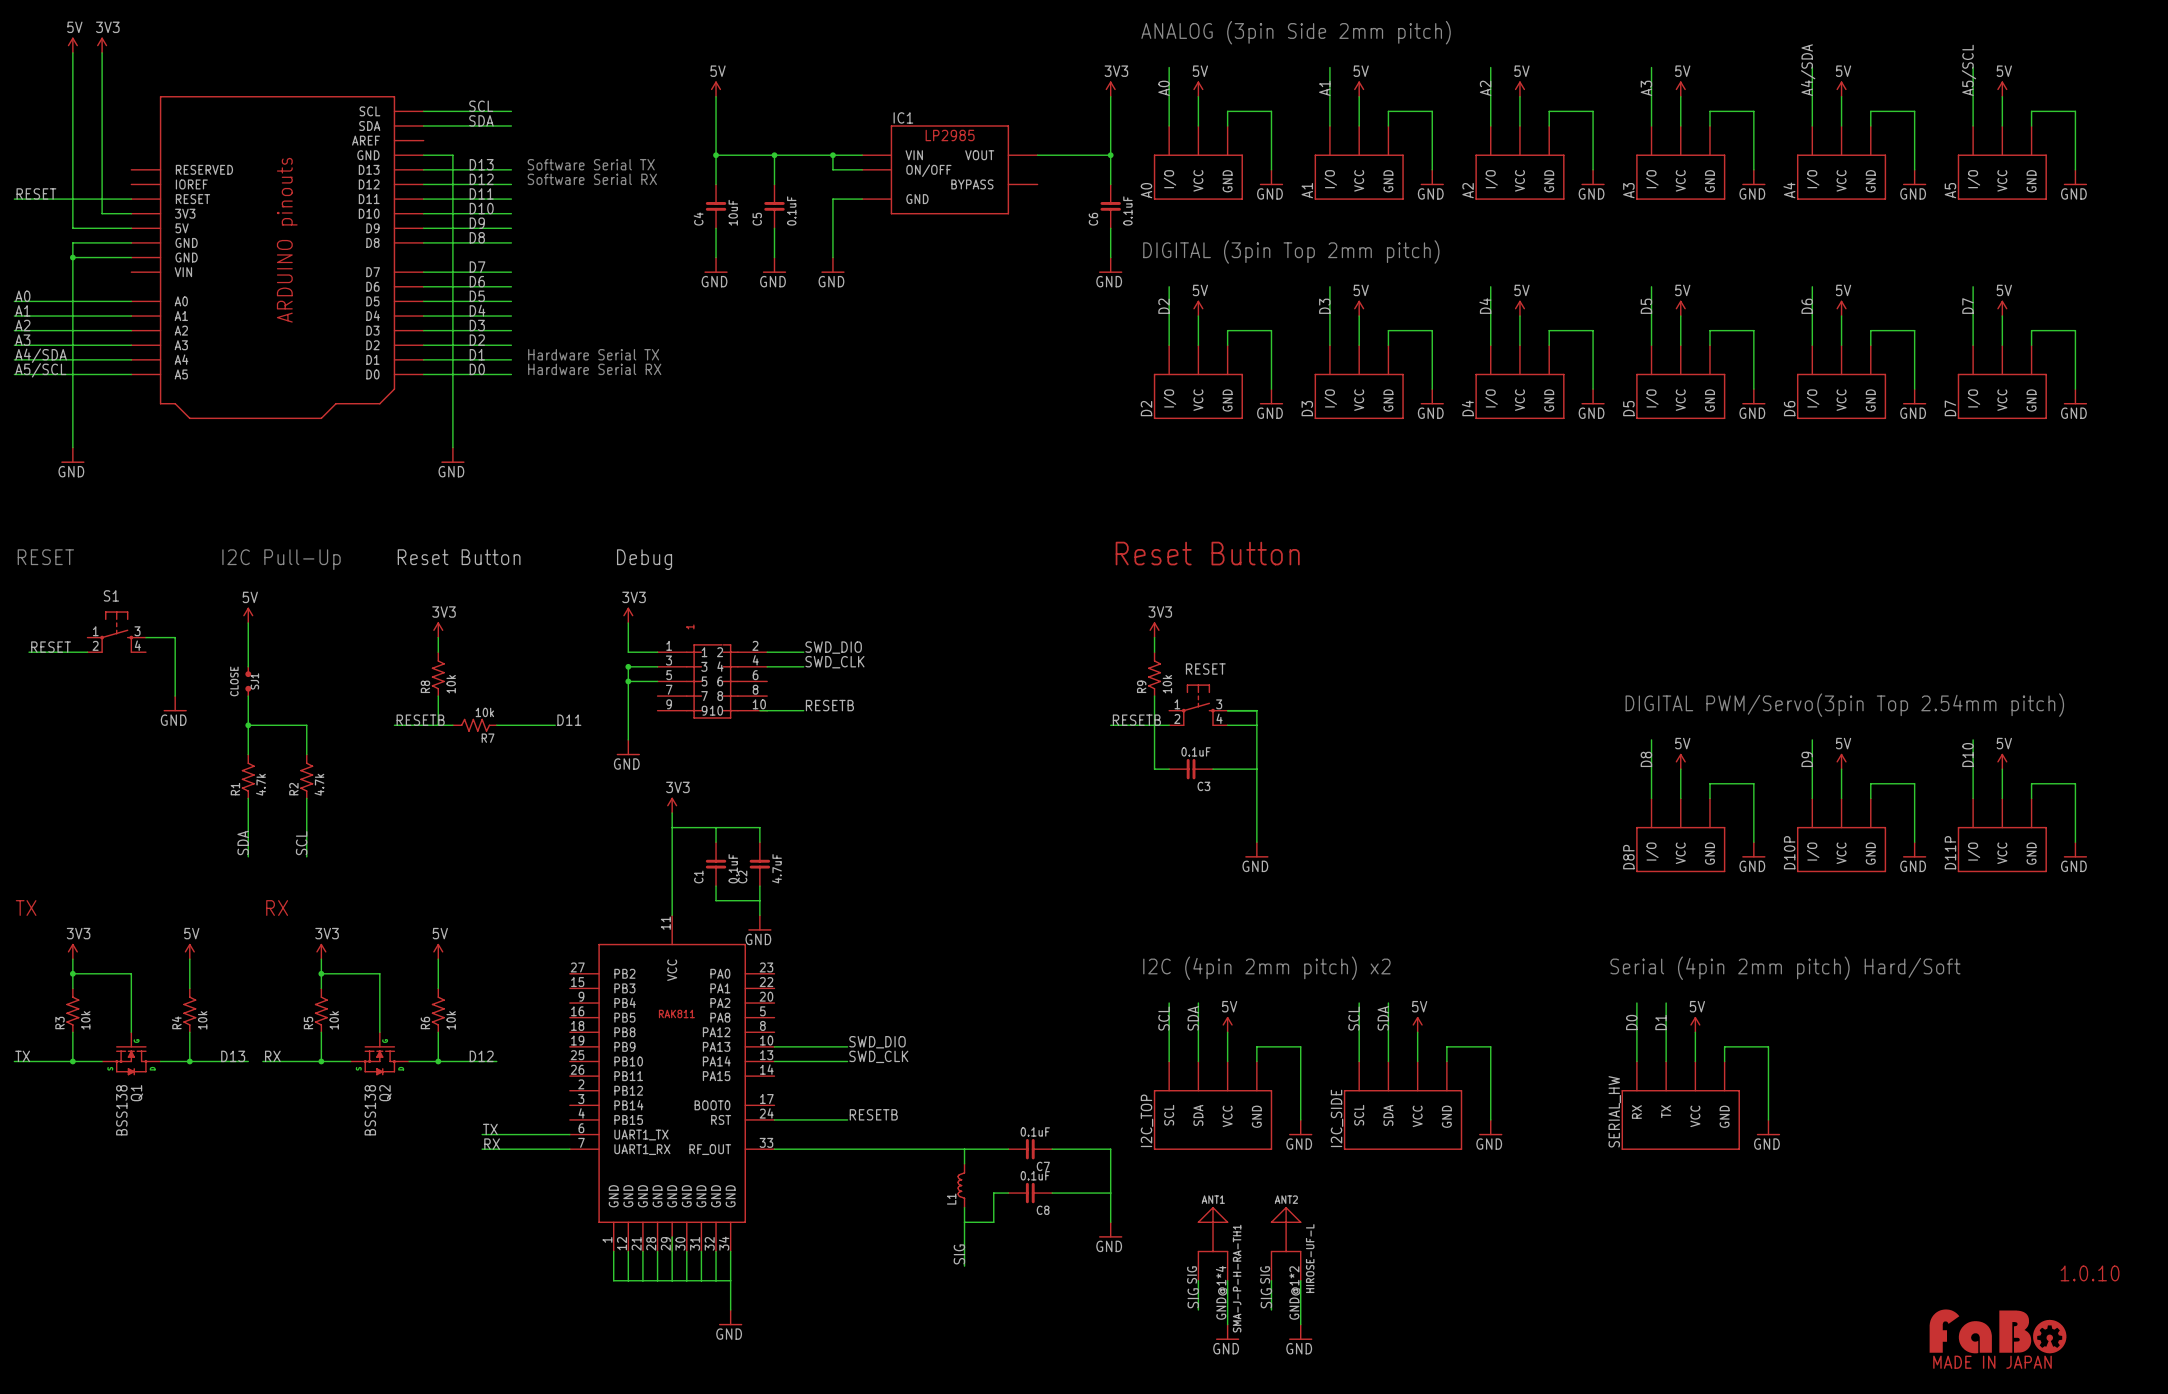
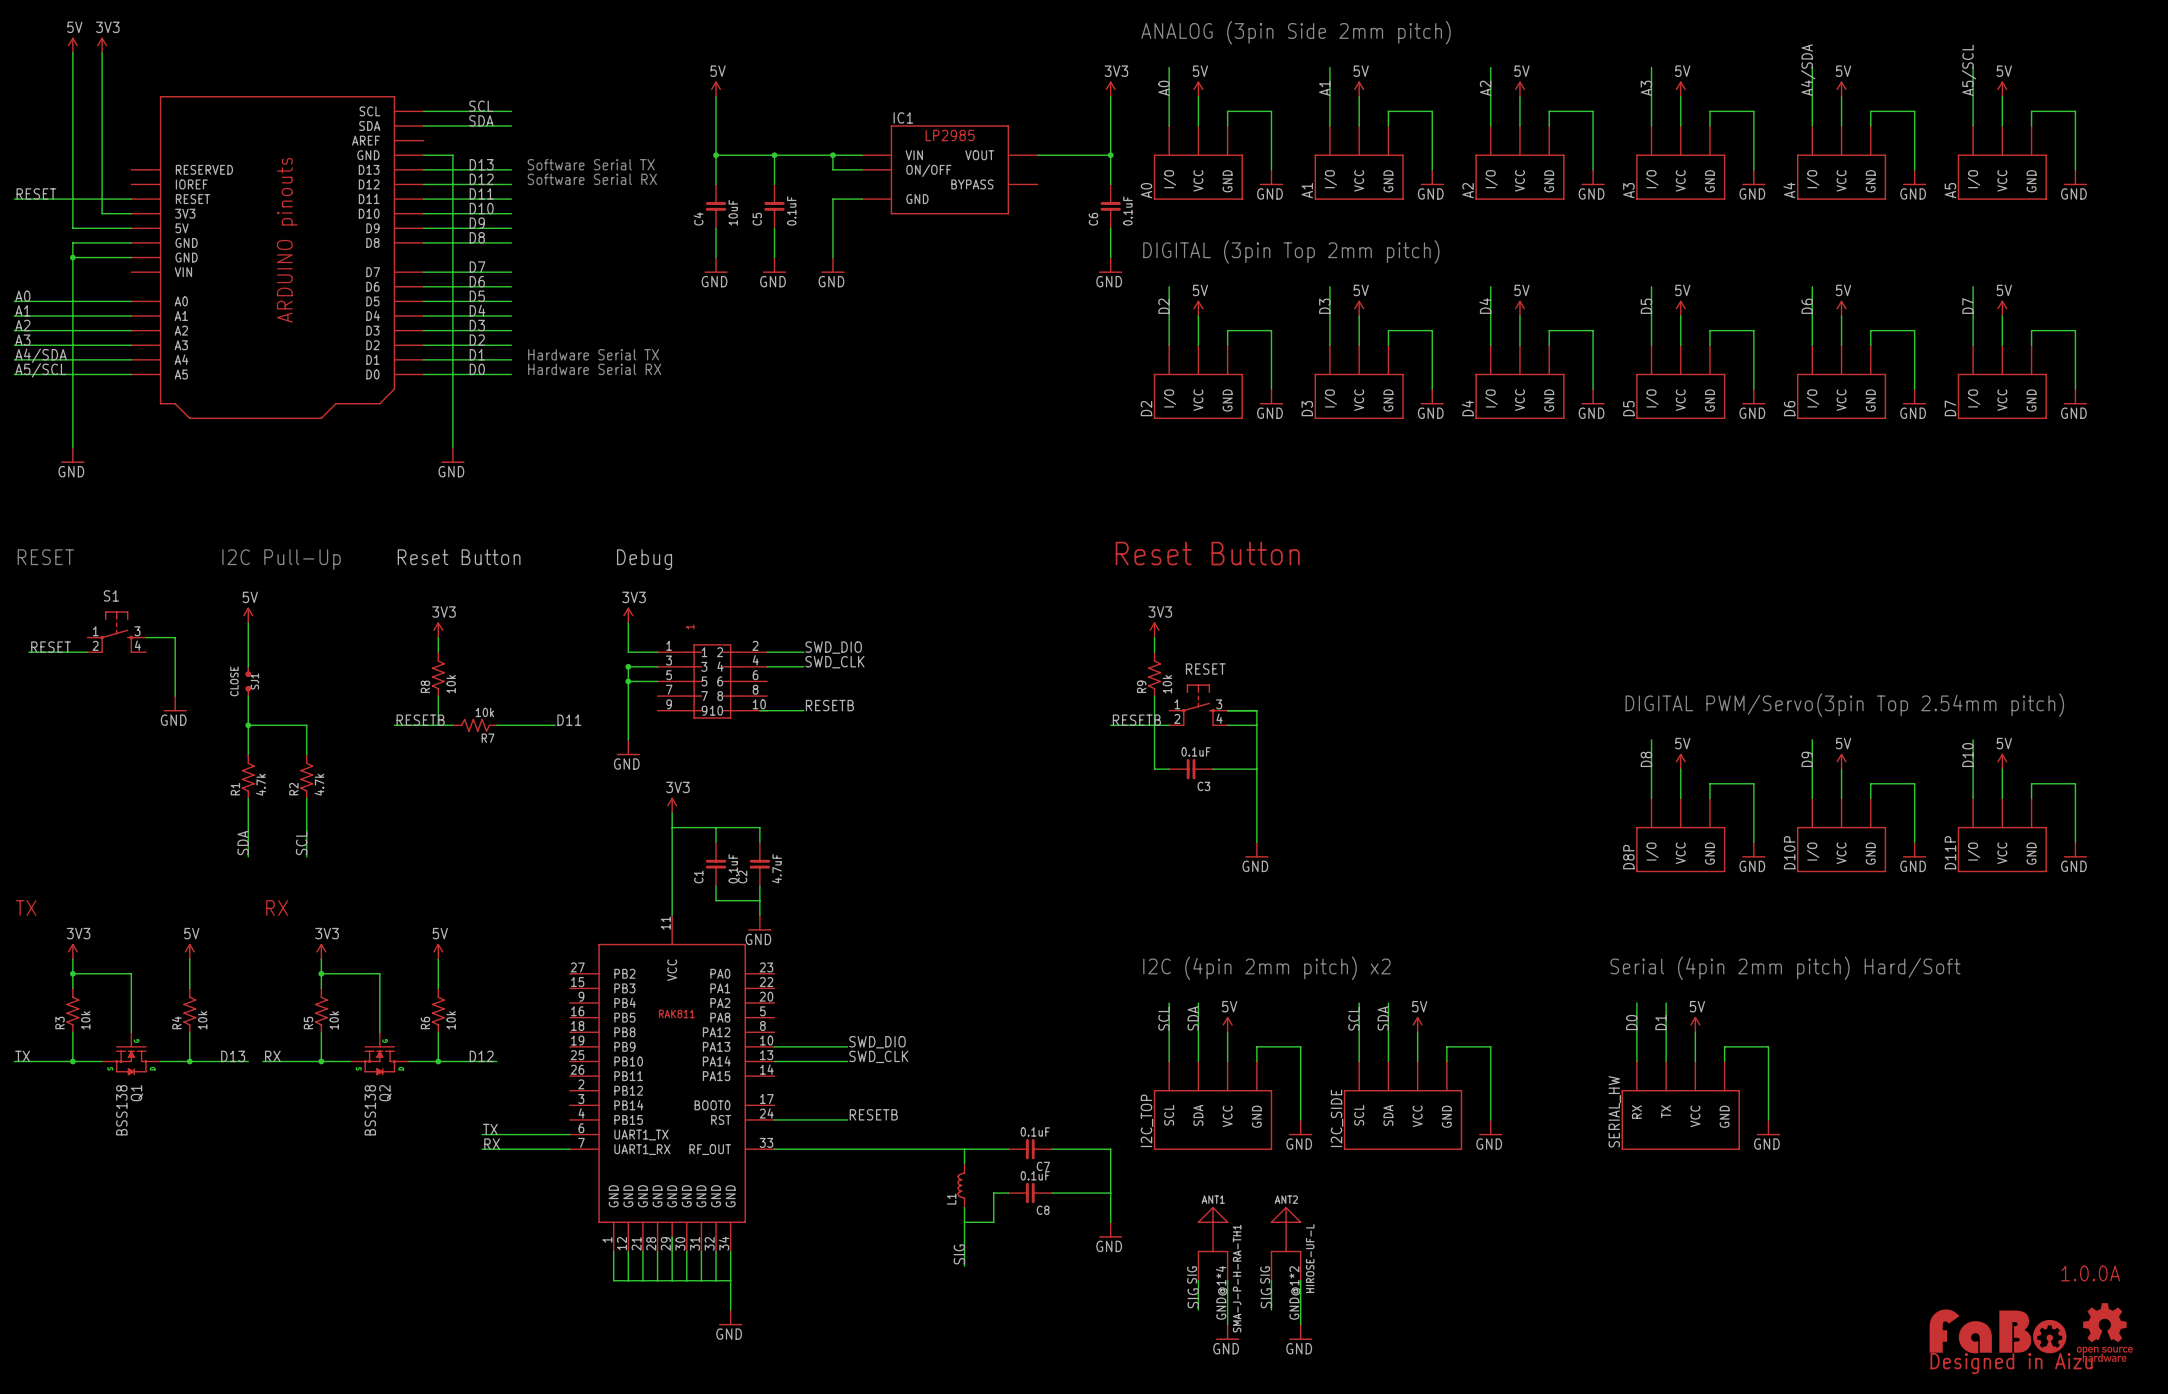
text: 1.0.10 (2090, 1273) -> 1.0.0A (2090, 1273)
part: none -> (2104, 1332)
part text: MADE IN JAPAN (1992, 1362) -> none
part text: none -> Designed in Aizu (2011, 1363)

